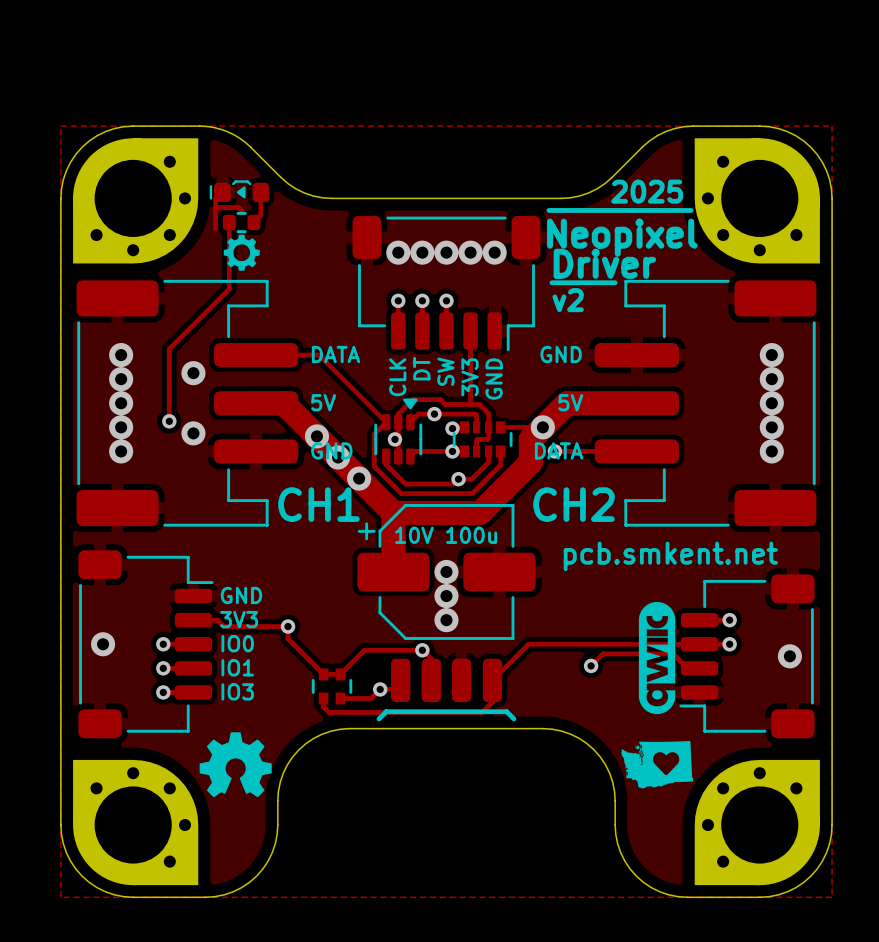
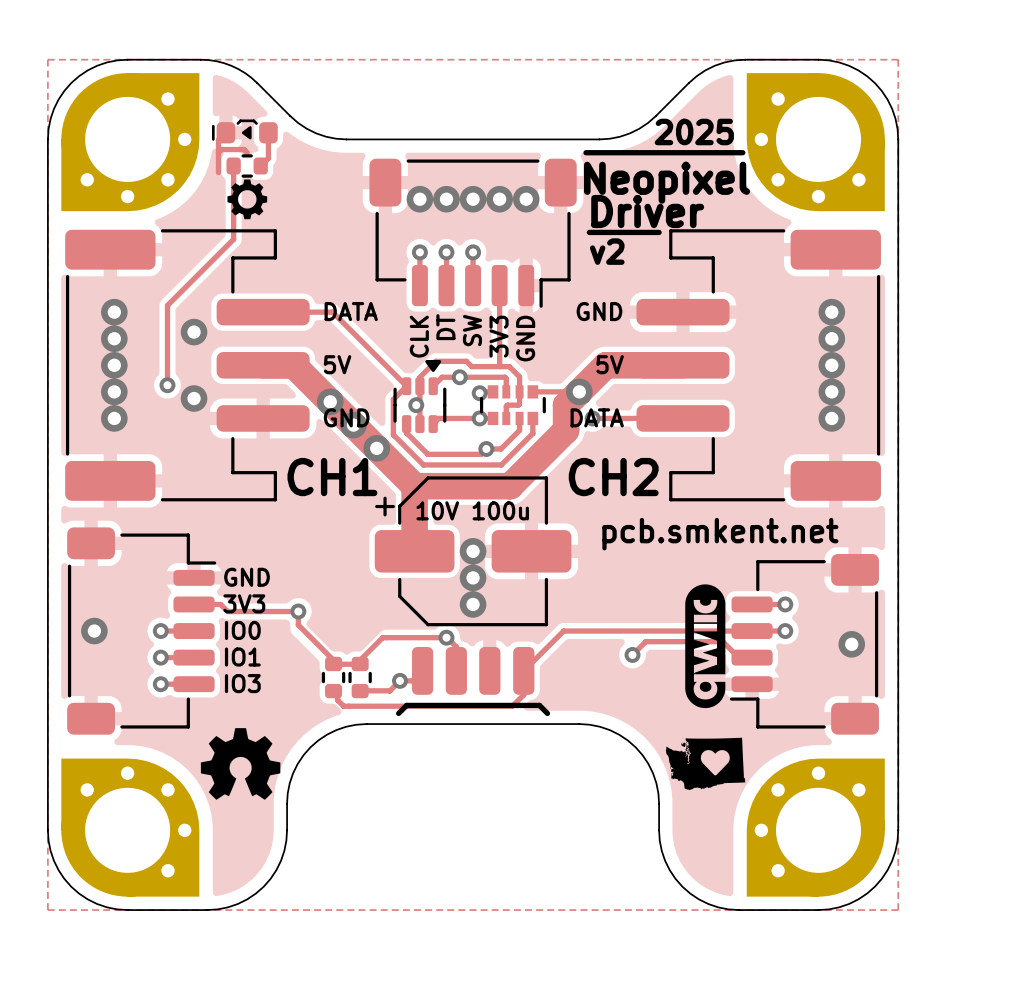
part: none -> (333, 677)
part: (332, 686) -> none
part: none -> (360, 677)

